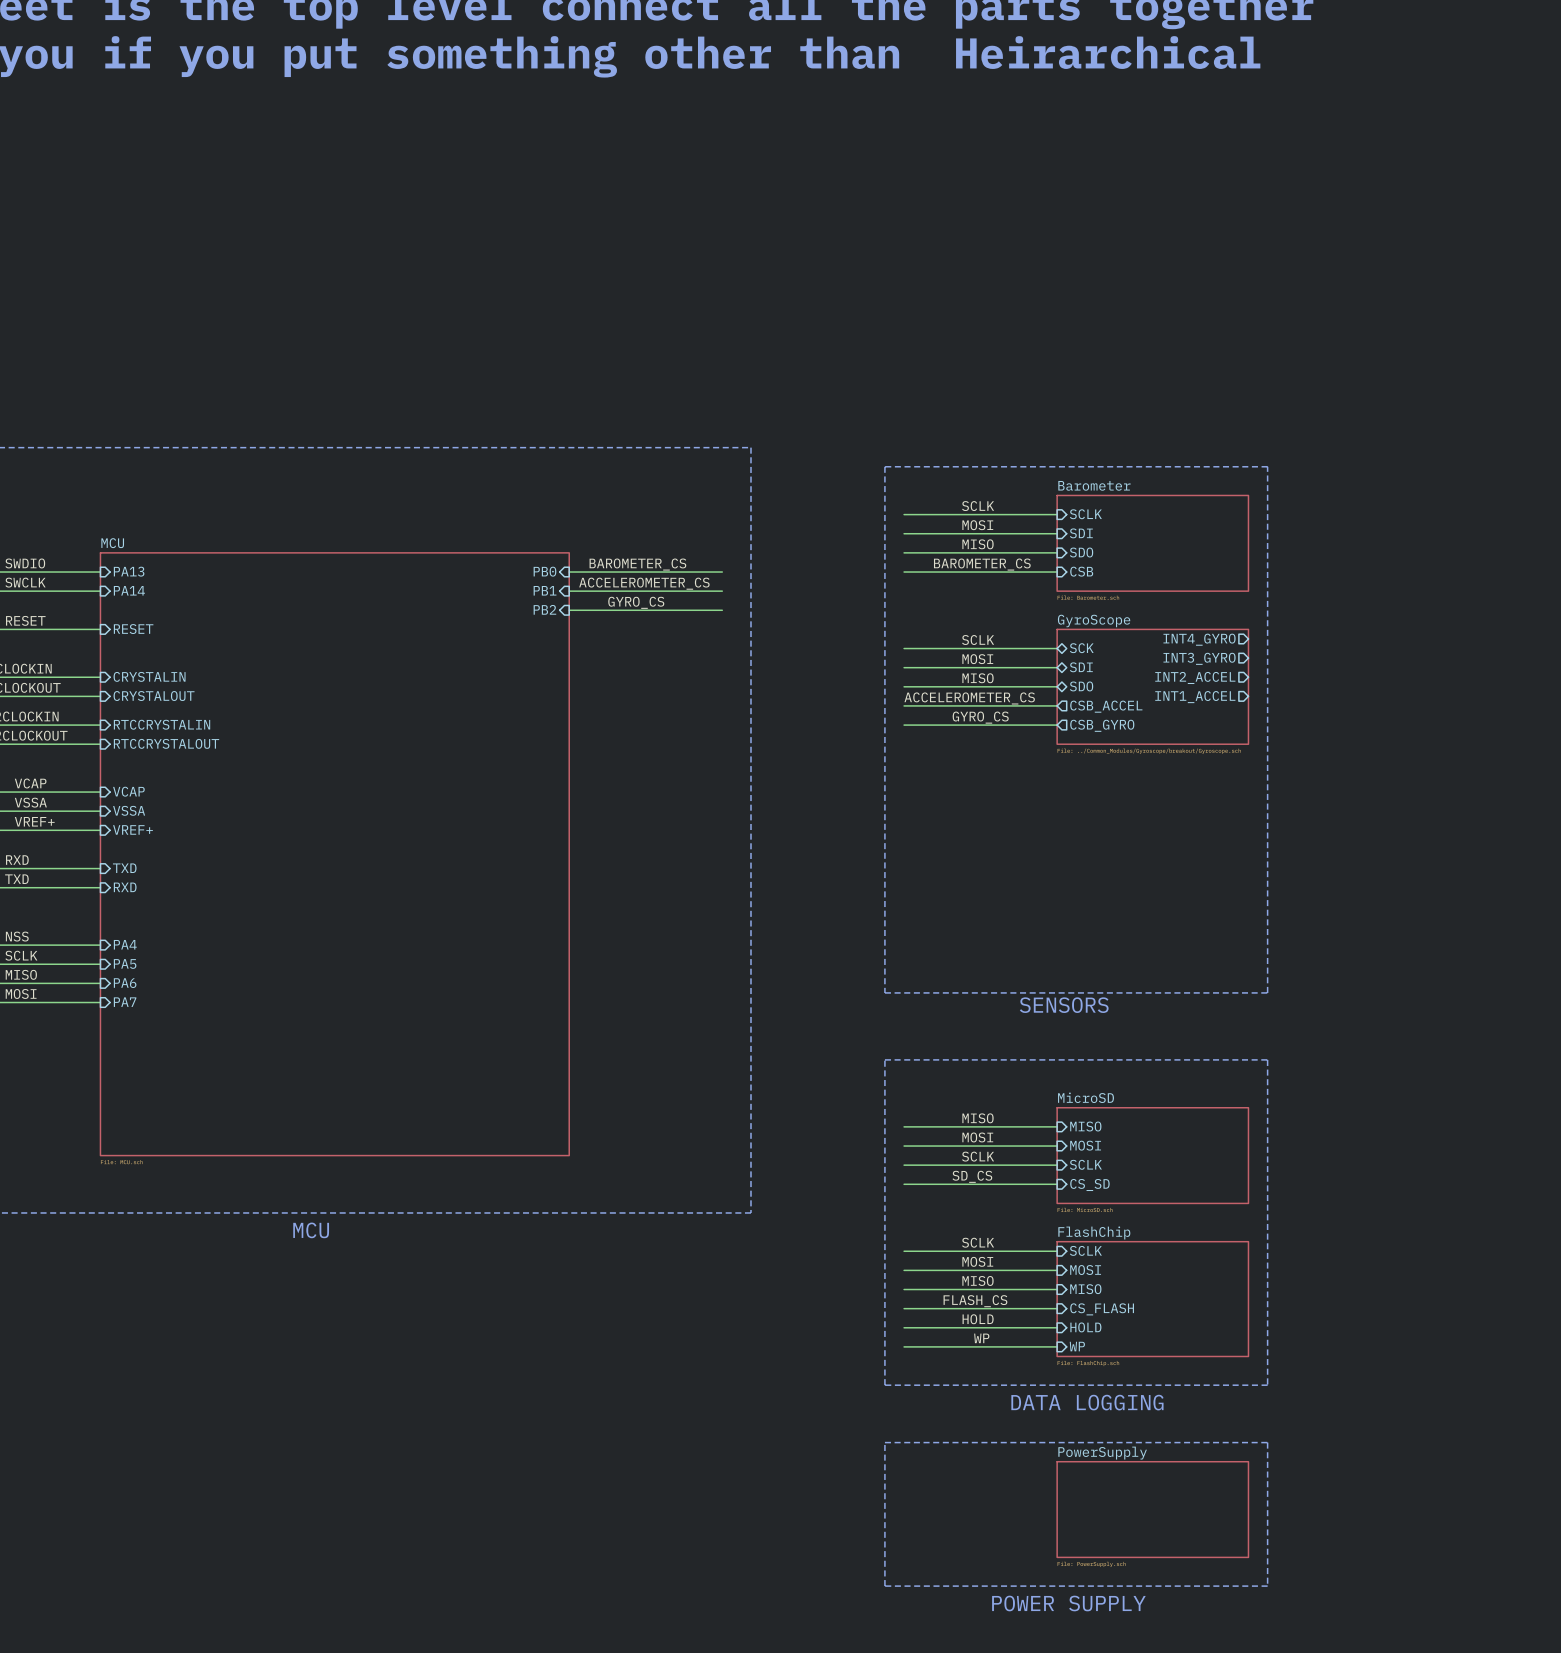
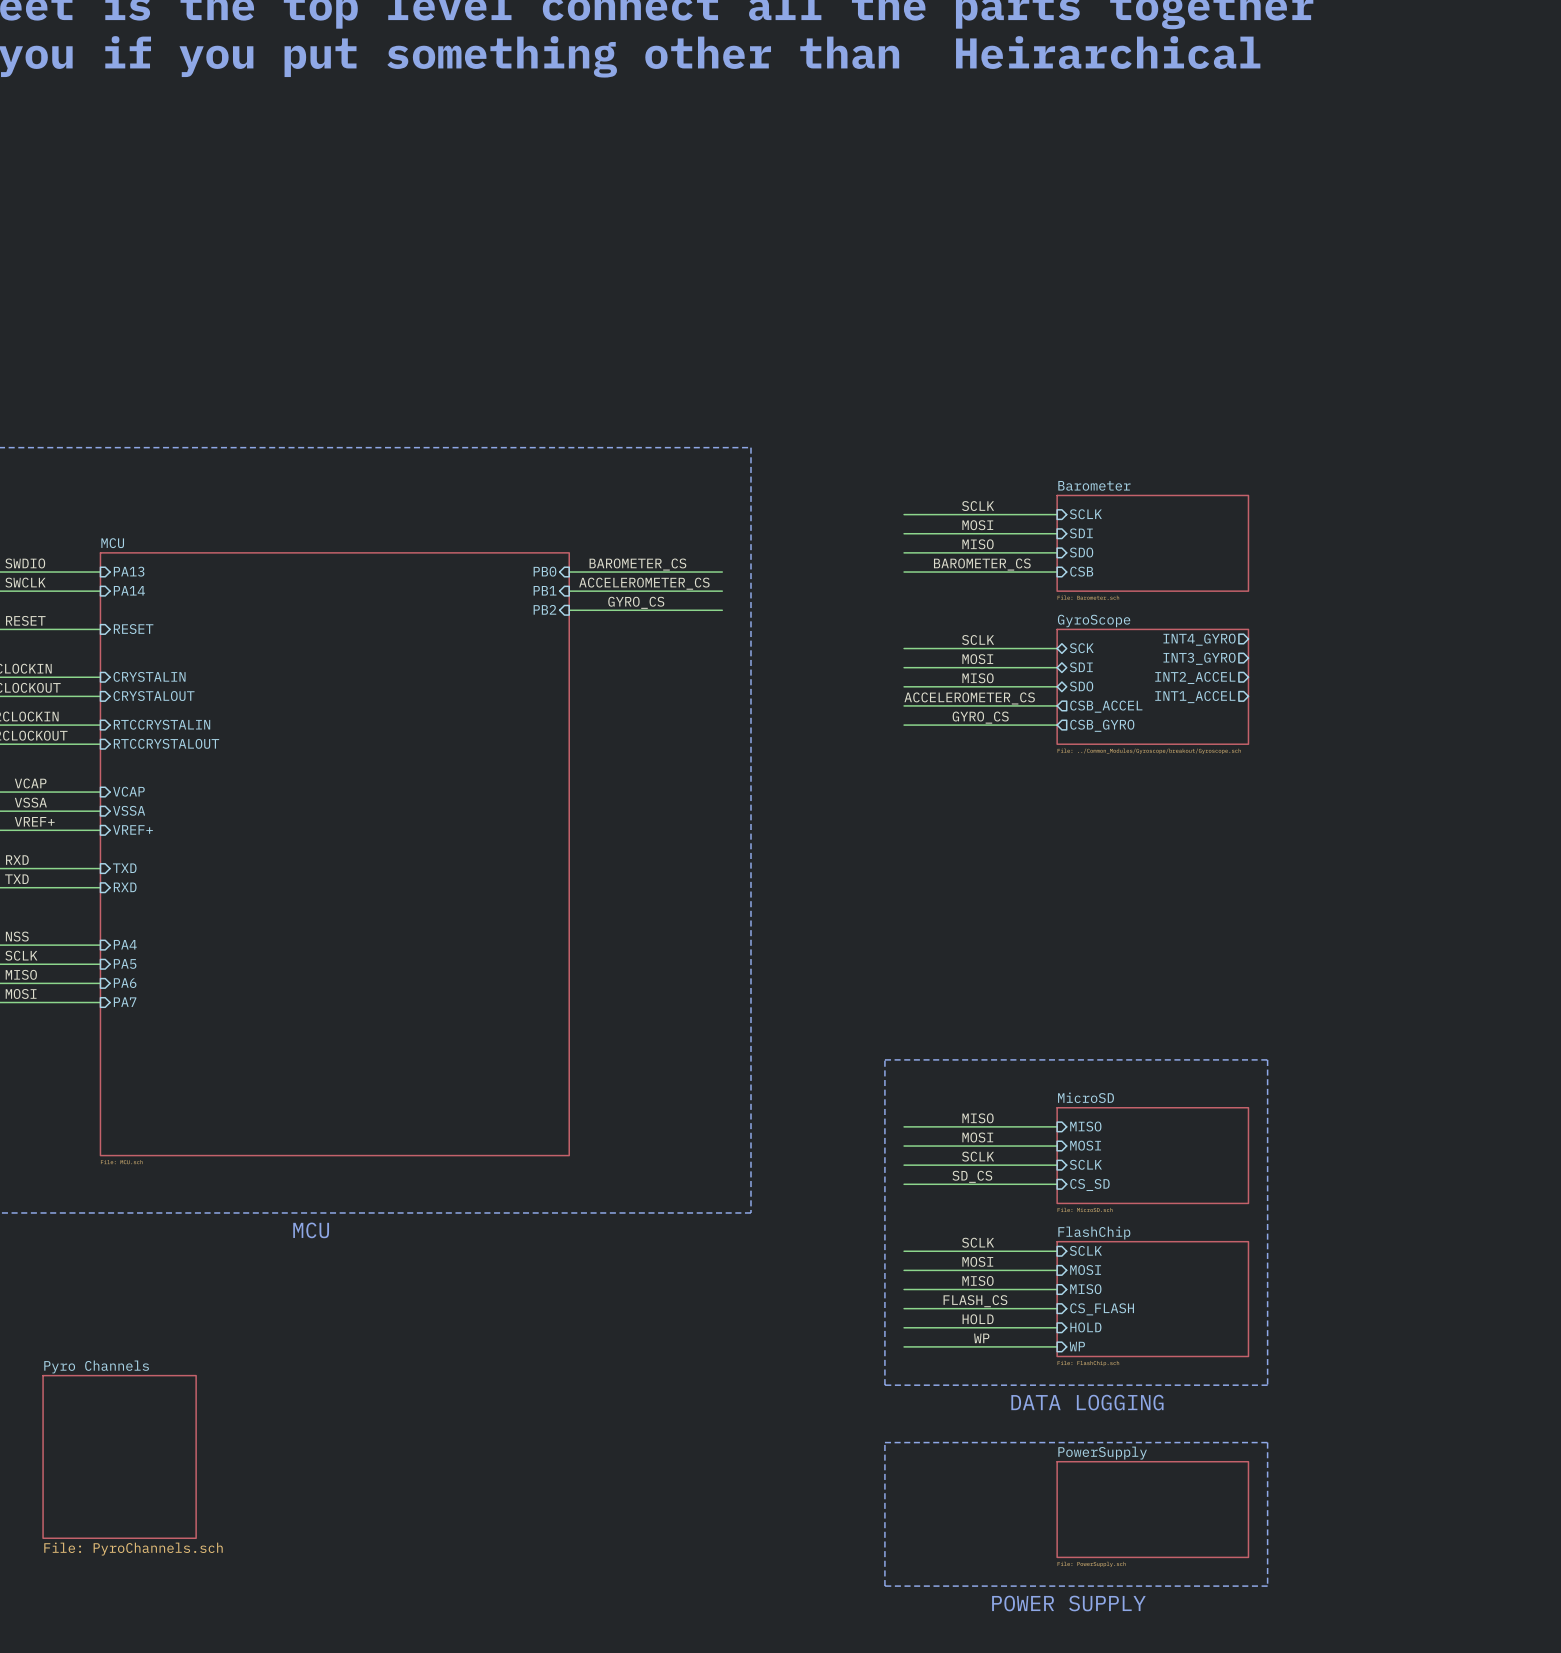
line: (884, 466) (1267, 466) (1267, 992) (884, 992) (884, 466) -> none
text: SENSORS (1064, 1005) -> none
sheet Pyro Channels: none -> File: PyroChannels.sch (119, 1456)

